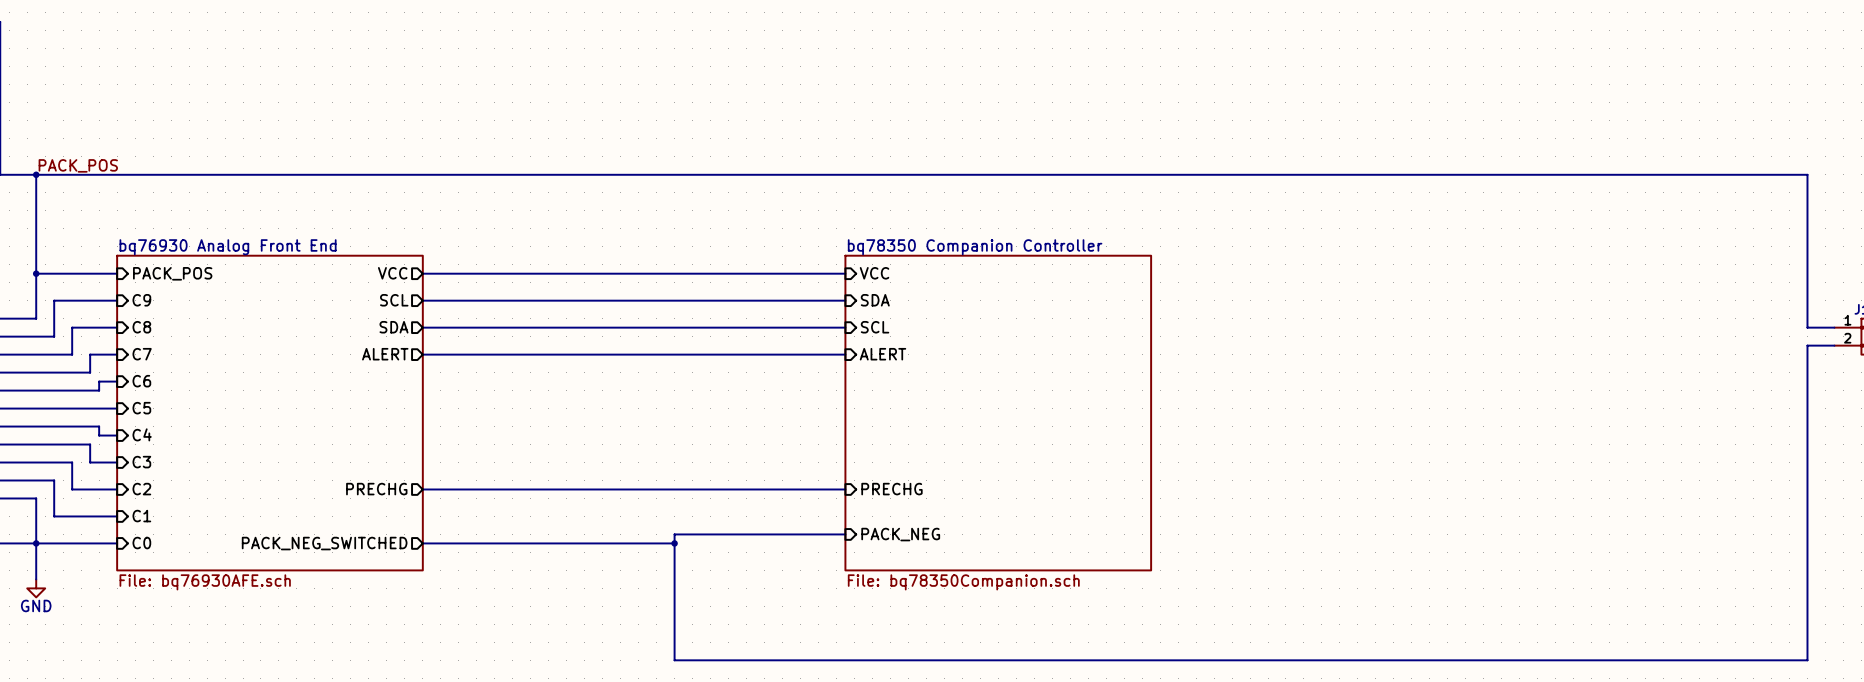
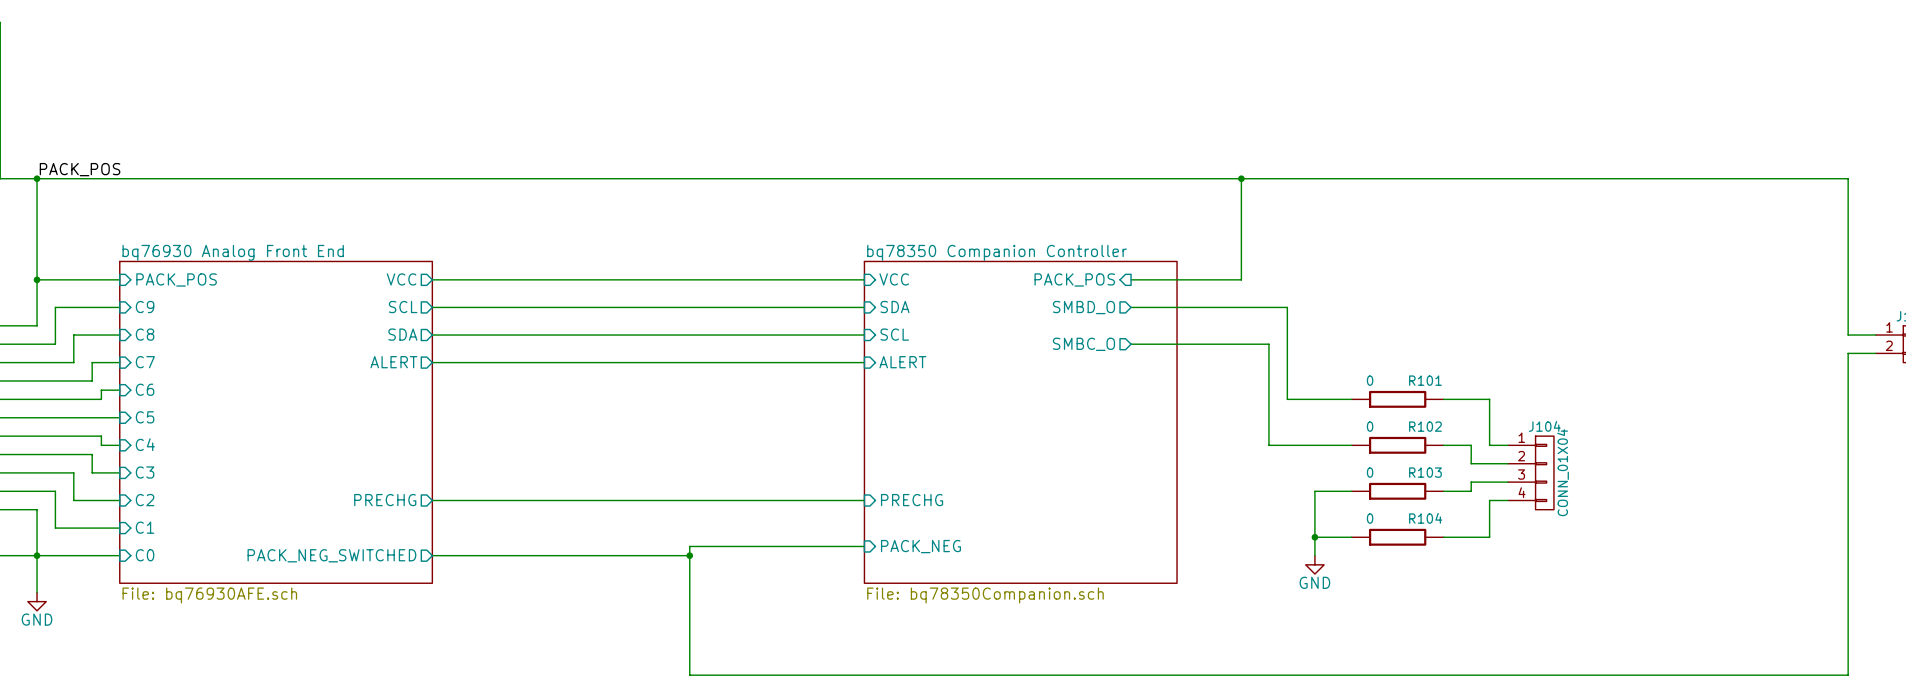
wire: none -> (1241, 178) (1241, 279) (1131, 279)
junction: none -> (1241, 178)
sheet pin: none -> PACK_POS (1074, 279)
sheet pin: none -> SMBD_O (1083, 307)
wire: none -> (1131, 307) (1287, 307) (1287, 399) (1351, 399)
sheet pin: none -> SMBC_O (1083, 344)
wire: none -> (1131, 344) (1268, 344) (1268, 445) (1351, 445)
R101: none -> 0 (1397, 399)
wire: none -> (1443, 399) (1489, 399) (1489, 445) (1507, 445)
R102: none -> 0 (1397, 445)
wire: none -> (1443, 445) (1471, 445) (1471, 463) (1507, 463)
J104: none -> CONN_01X04 (1530, 472)
wire: none -> (1507, 482) (1471, 482) (1471, 491) (1443, 491)
wire: none -> (1351, 491) (1314, 491) (1314, 555)
R103: none -> 0 (1397, 491)
wire: none -> (1507, 500) (1489, 500) (1489, 537) (1443, 537)
wire: none -> (1314, 537) (1351, 537)
junction: none -> (1314, 537)
R104: none -> 0 (1397, 537)
power symbol: none -> GND (1314, 564)

